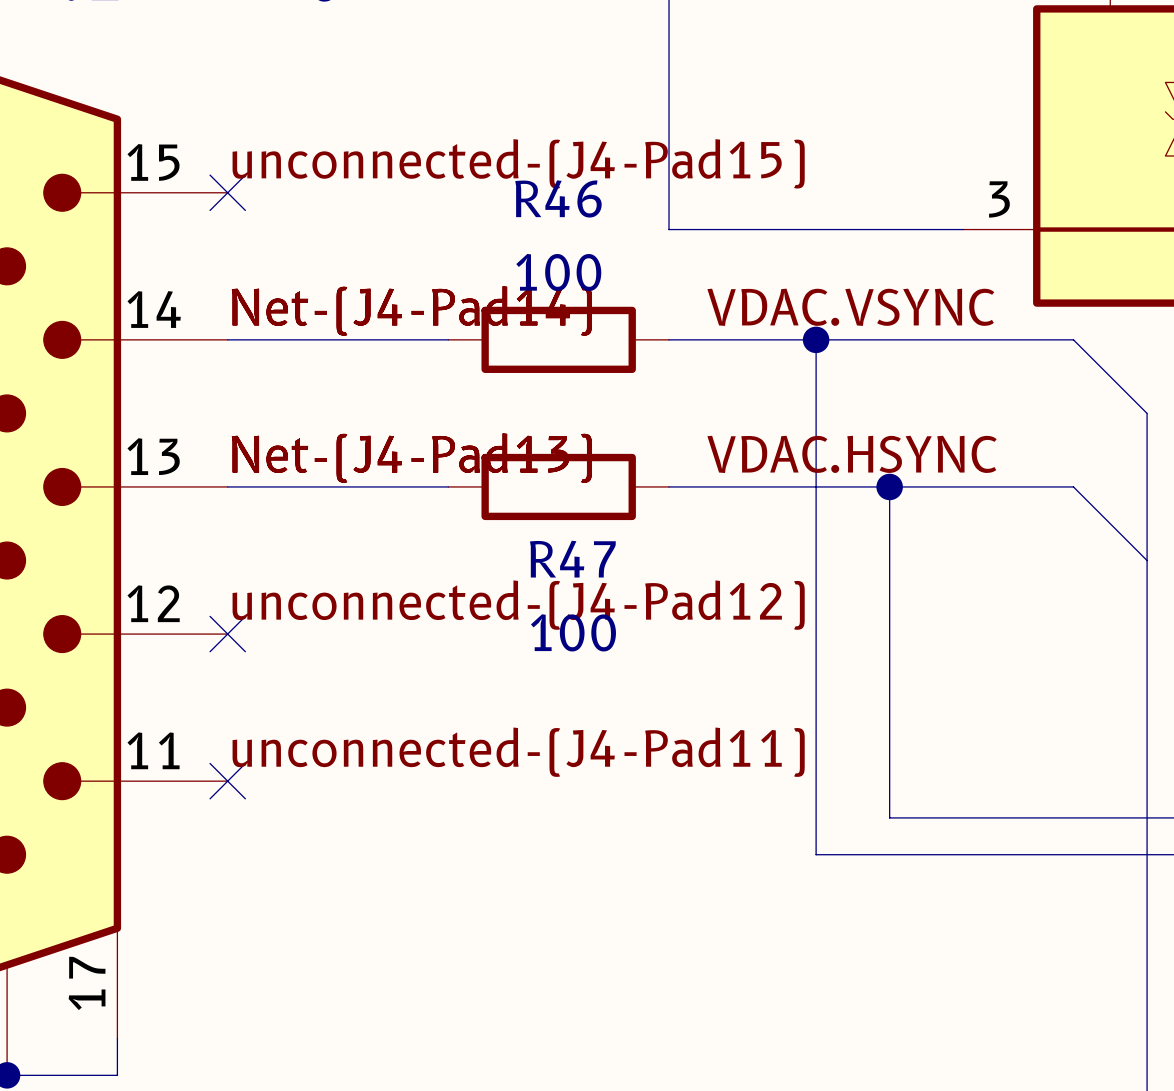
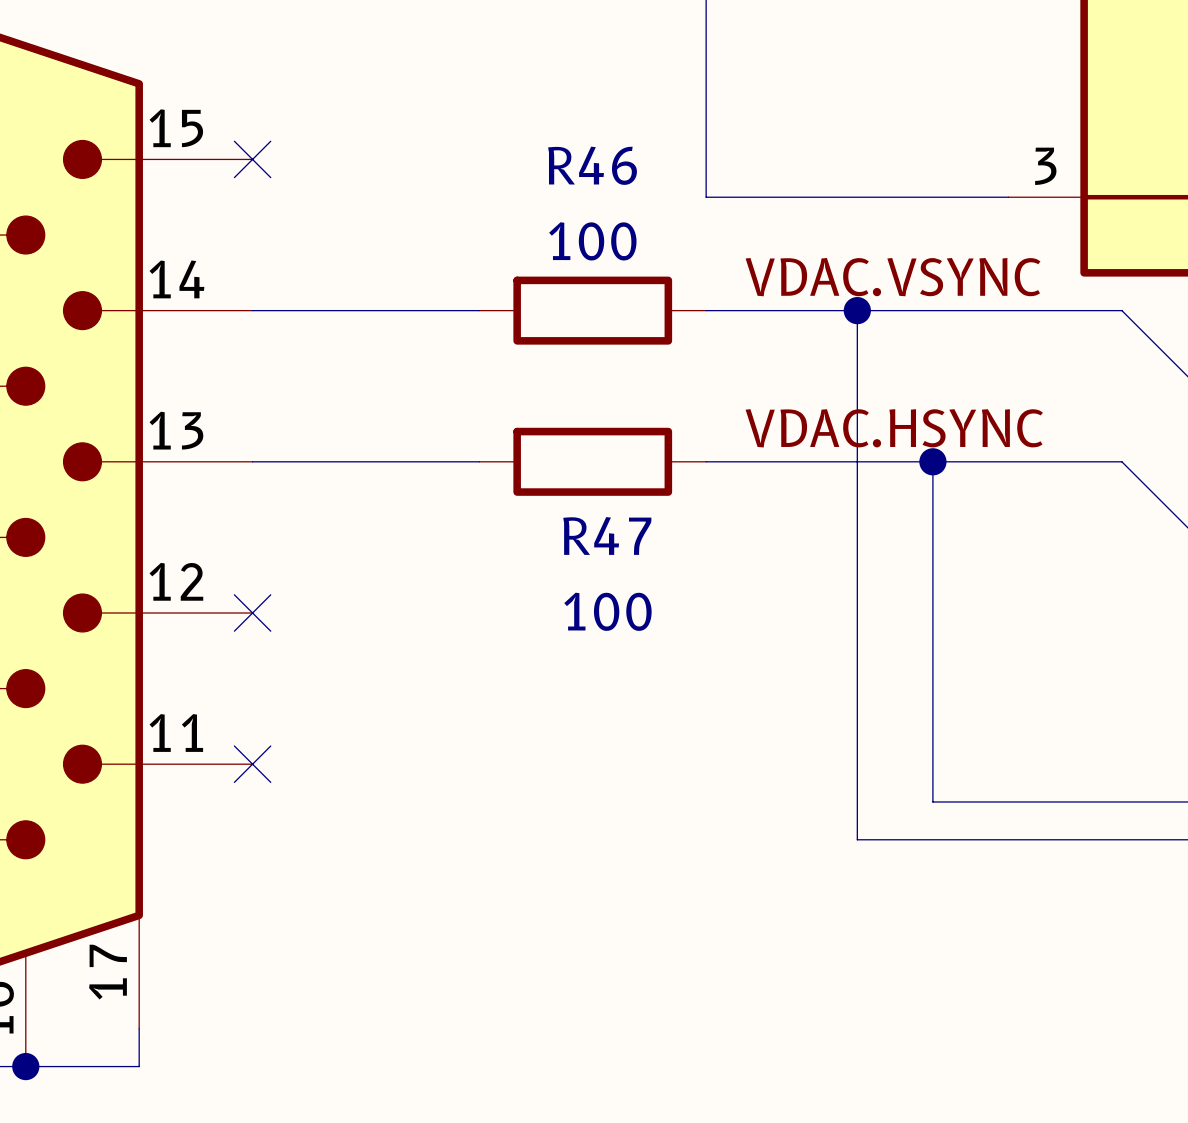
label: unconnected-(J4-Pad15) (518, 163) -> none
label: Net-(J4-Pad14) (411, 310) -> none
label: Net-(J4-Pad13) (411, 458) -> none
label: unconnected-(J4-Pad12) (518, 605) -> none
label: unconnected-(J4-Pad11) (518, 752) -> none

